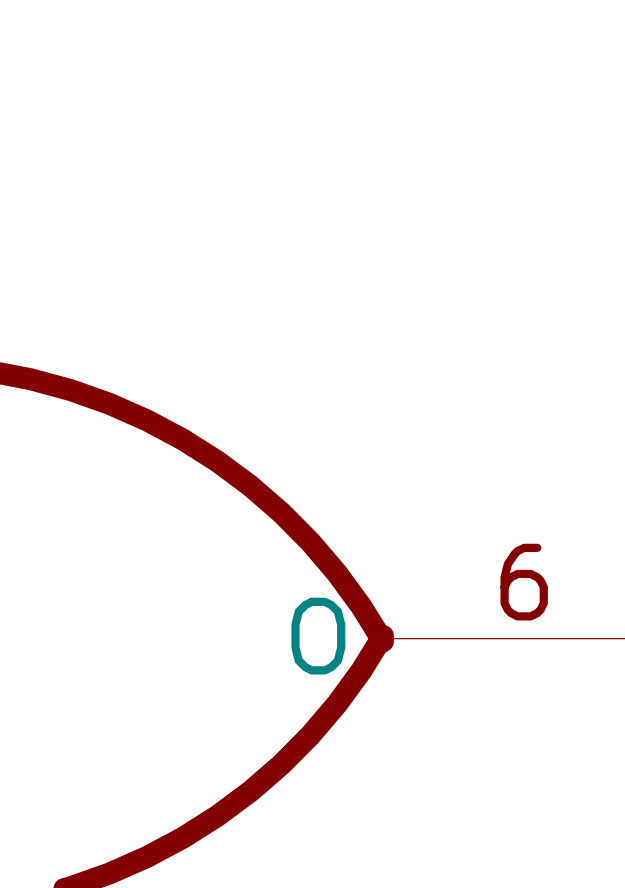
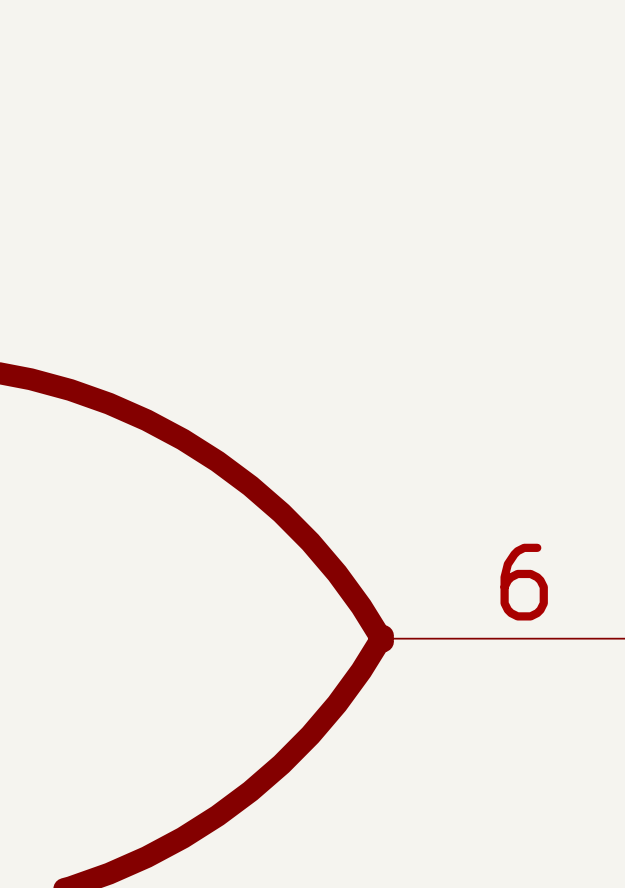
part pin name: O (318, 636) -> none

